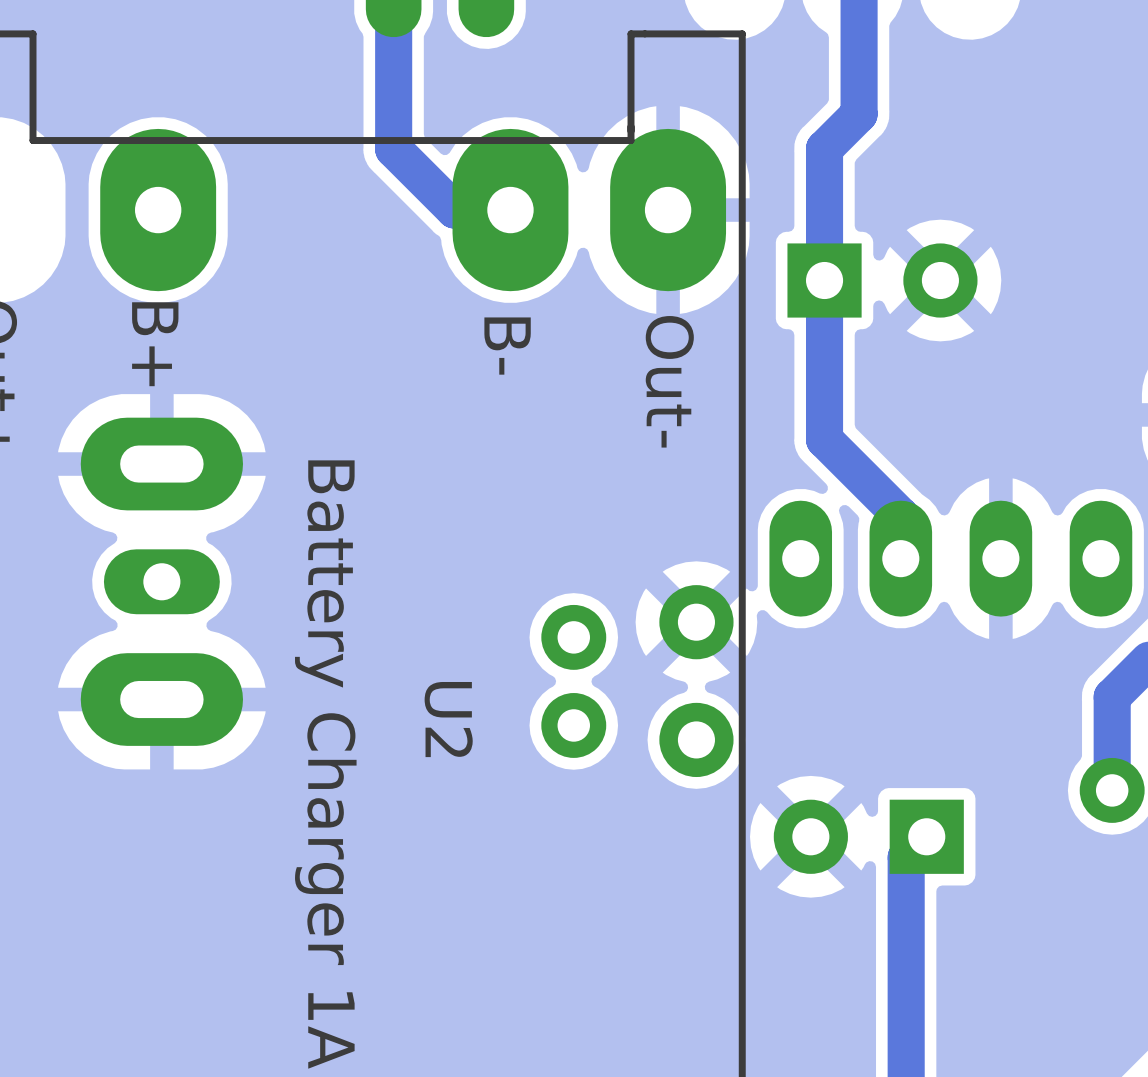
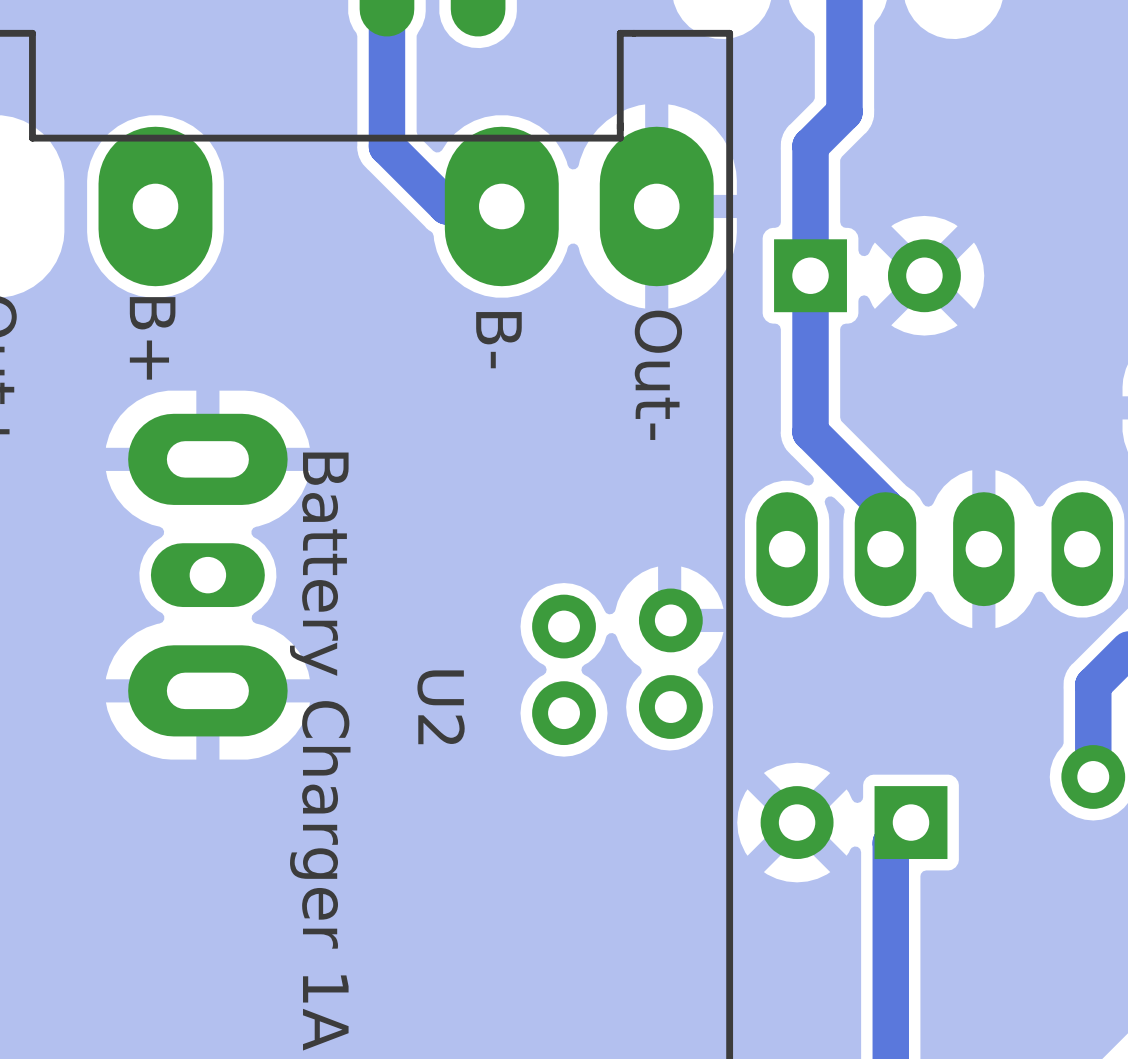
part position: (161, 581) -> (207, 575)
part footprint: [659, 585, 734, 778] -> [638, 588, 703, 739]

